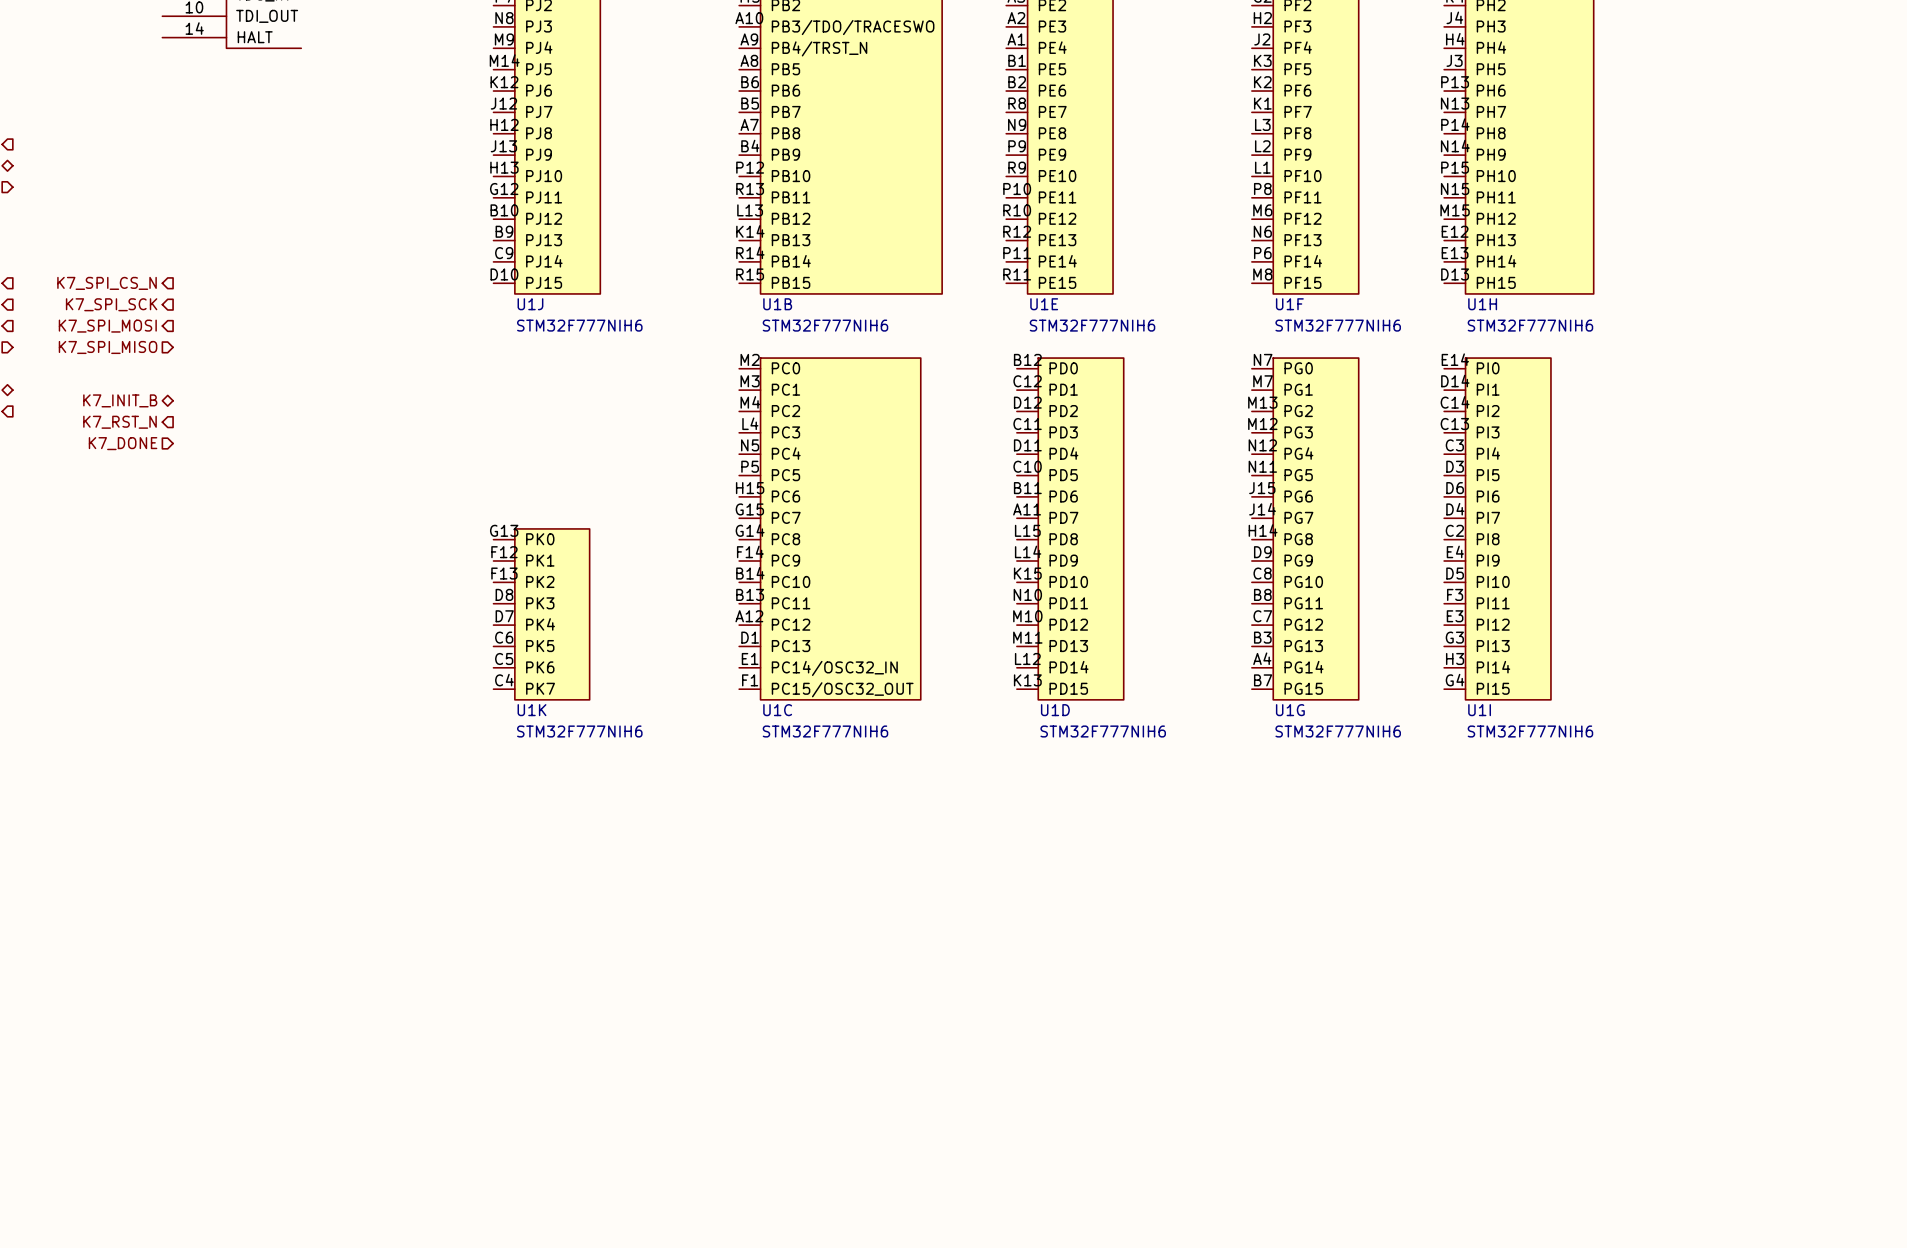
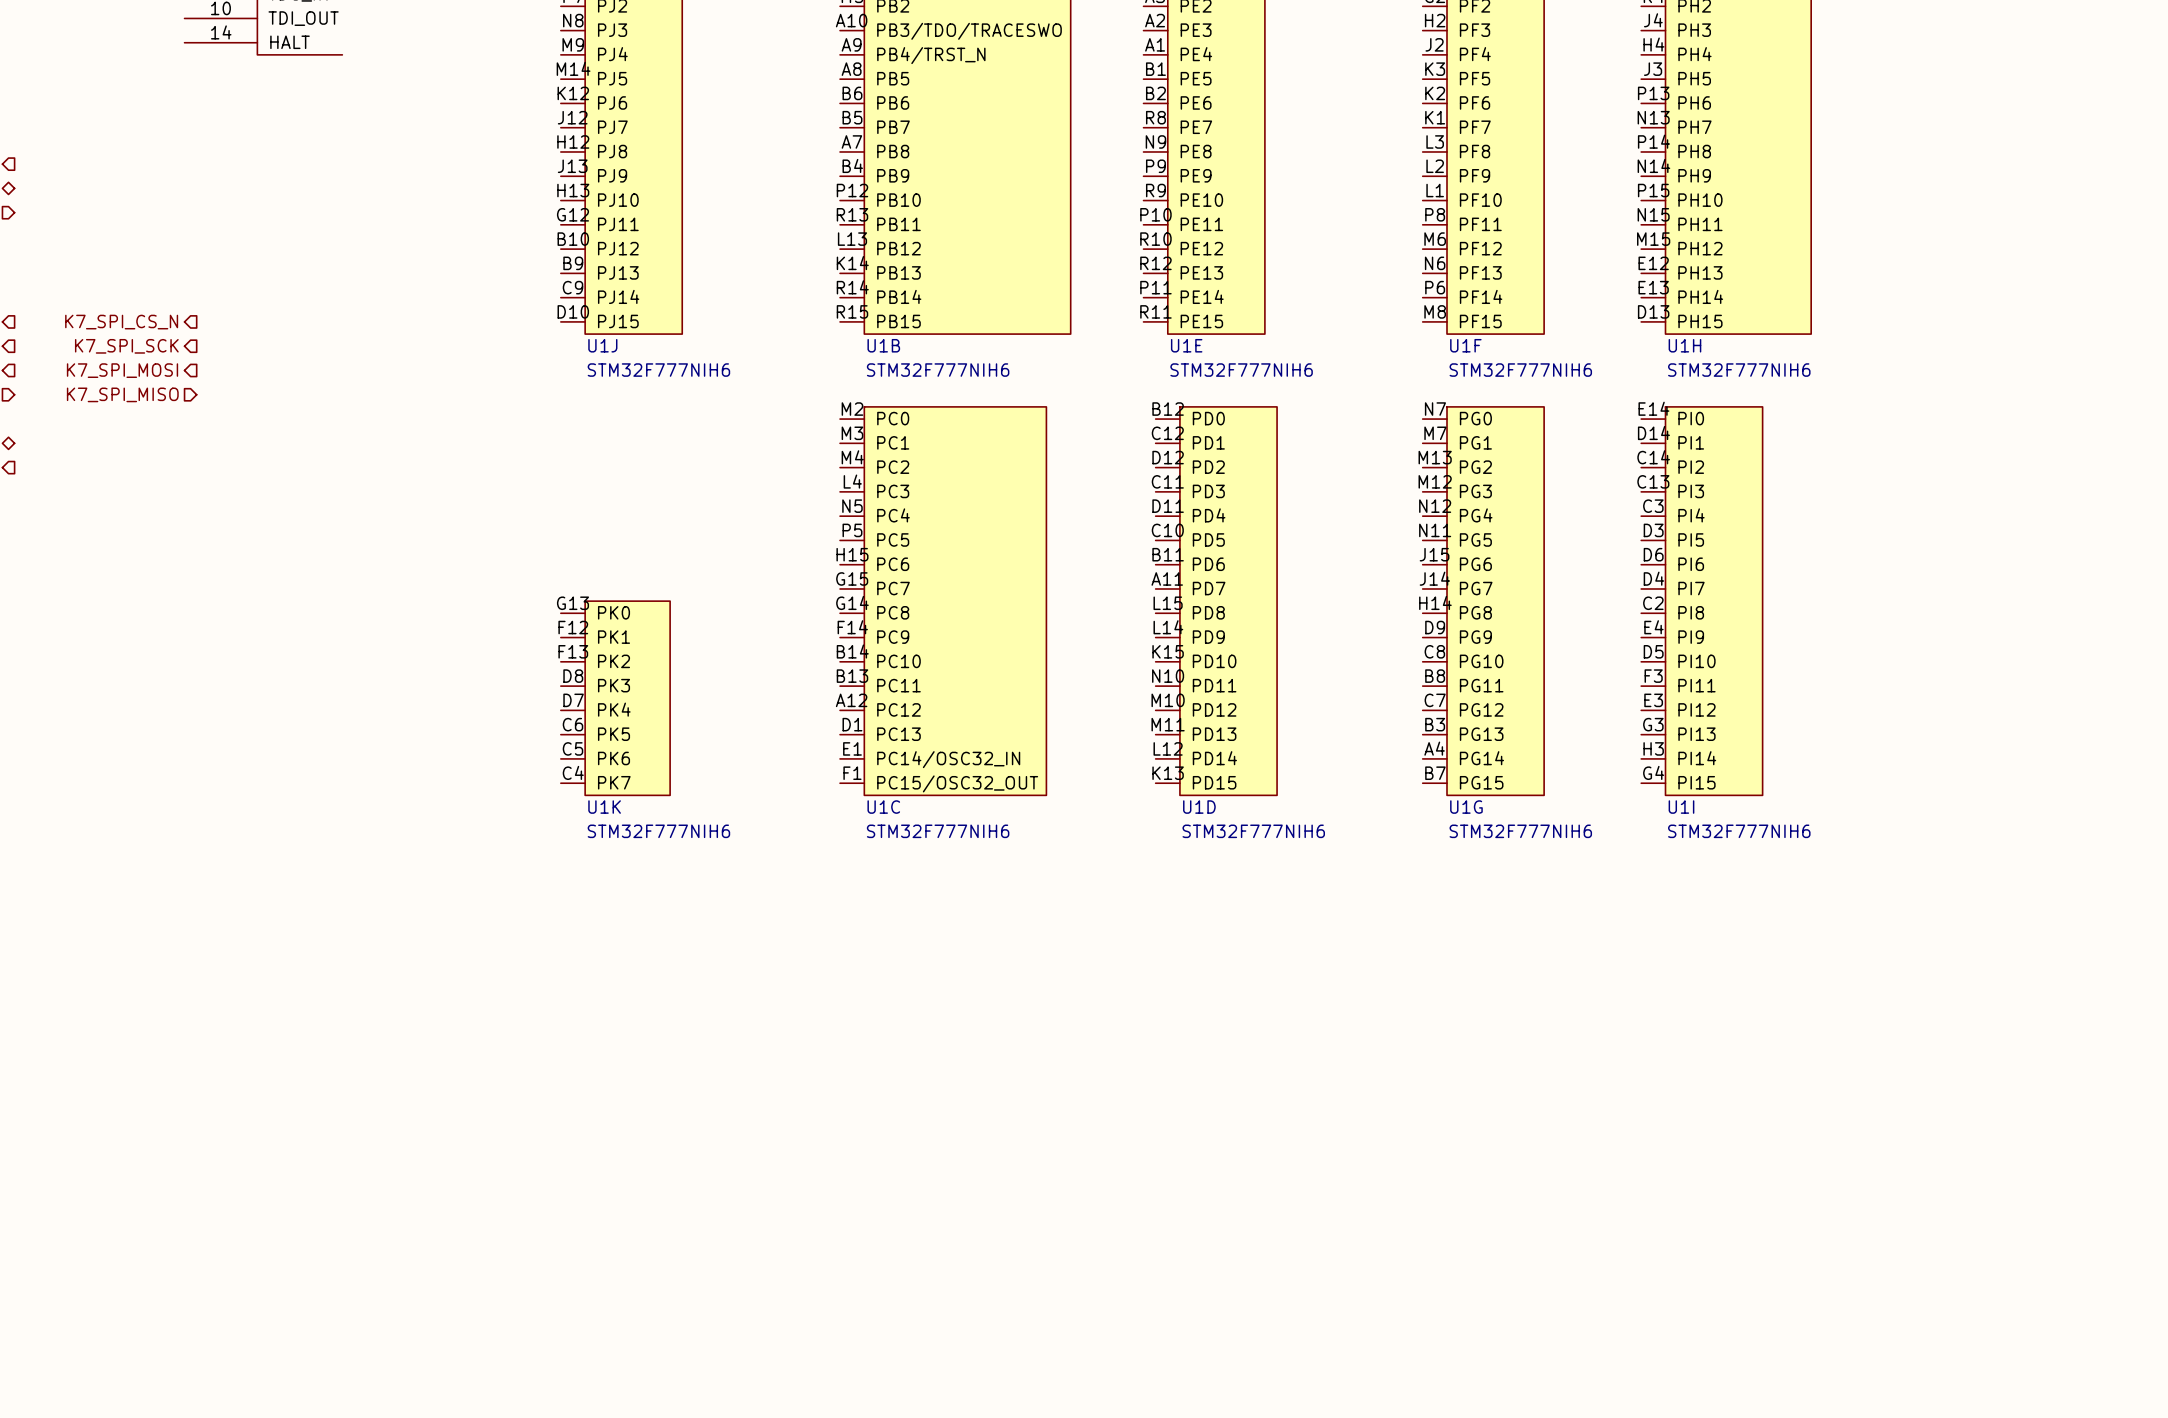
hierarchical label: K7_INIT_B (120, 400) -> none
hierarchical label: K7_RST_N (120, 422) -> none
hierarchical label: K7_DONE (123, 443) -> none

